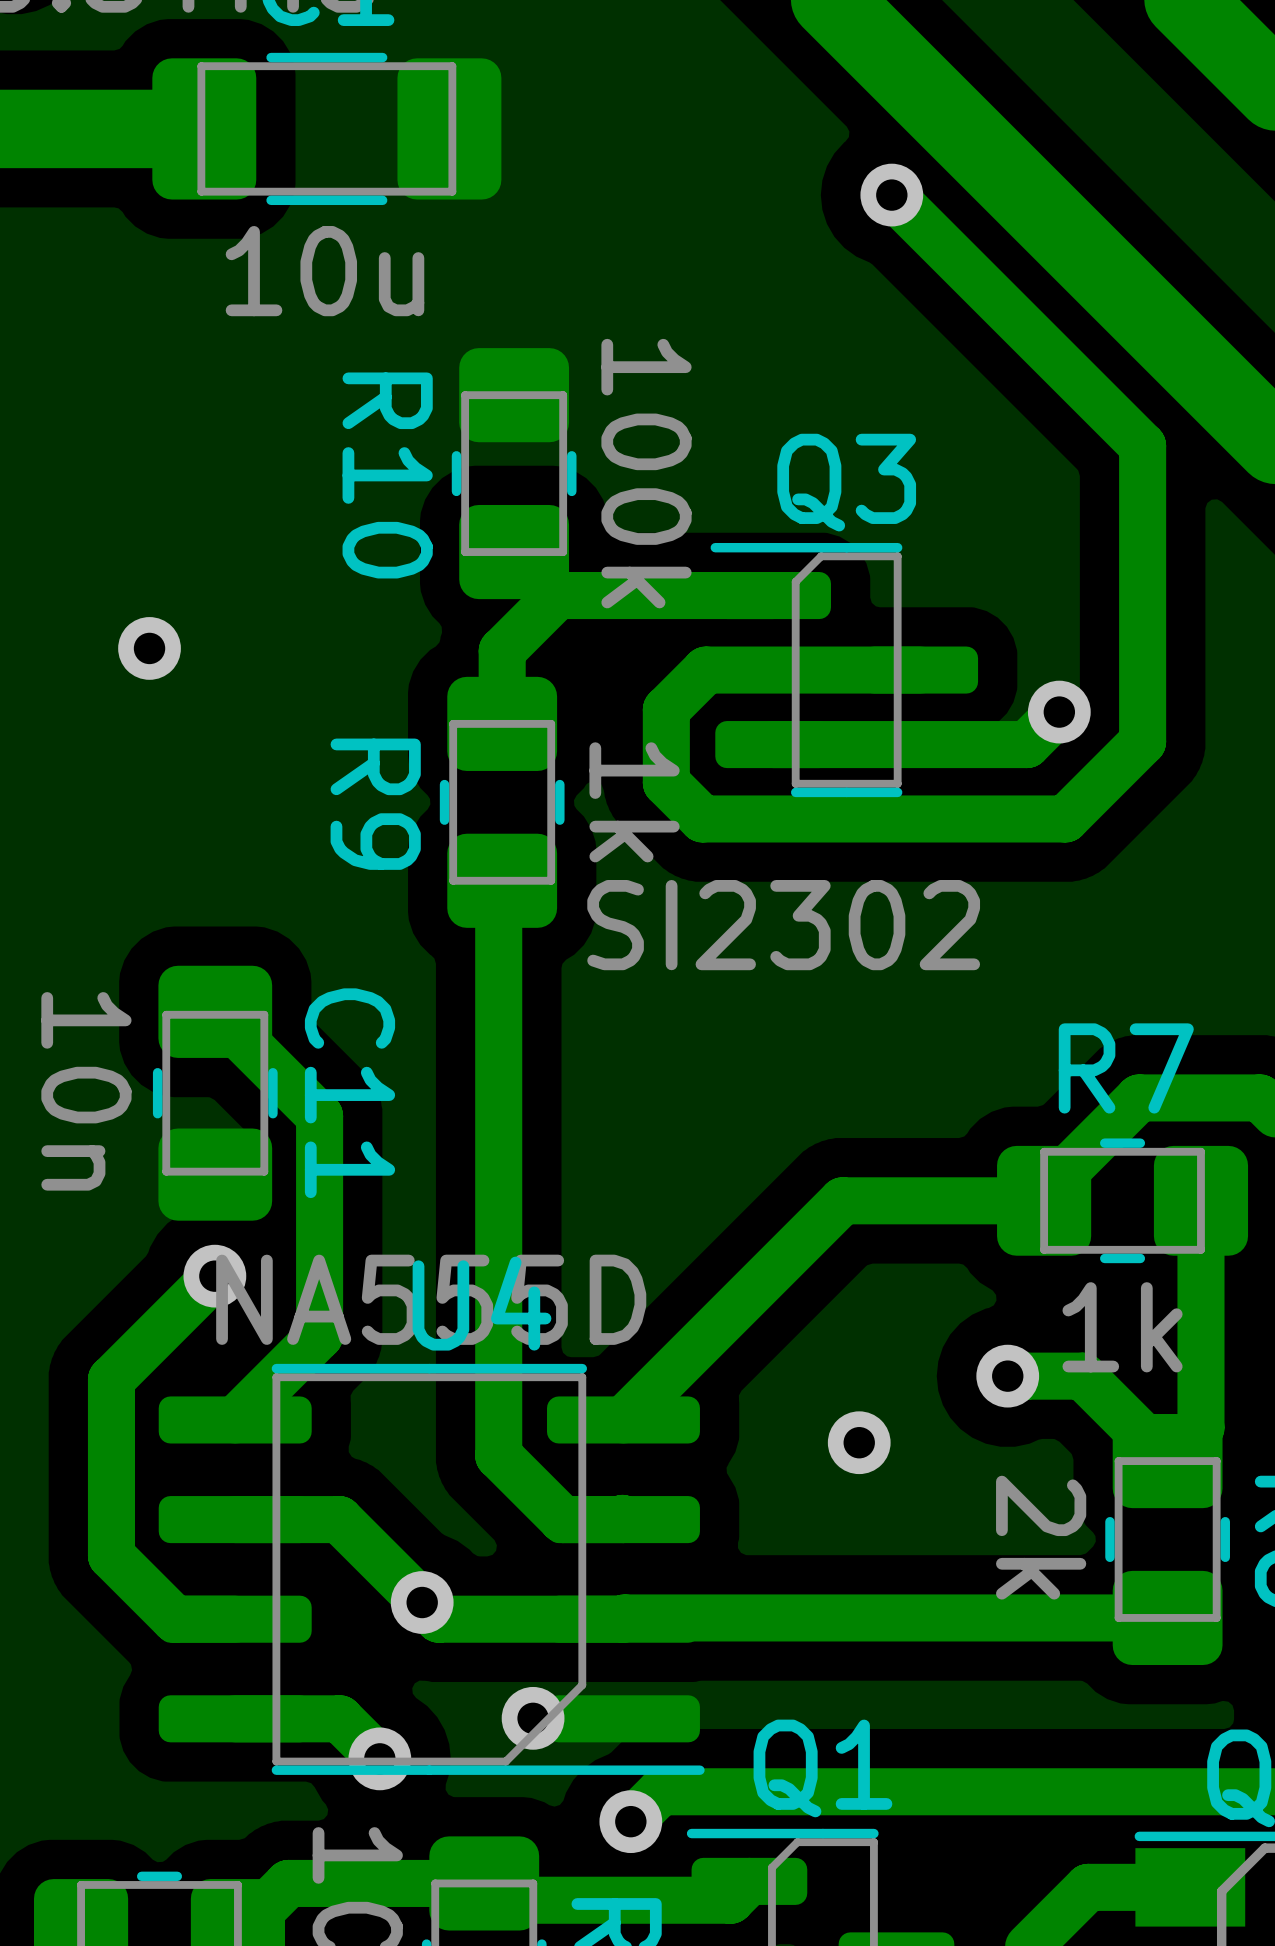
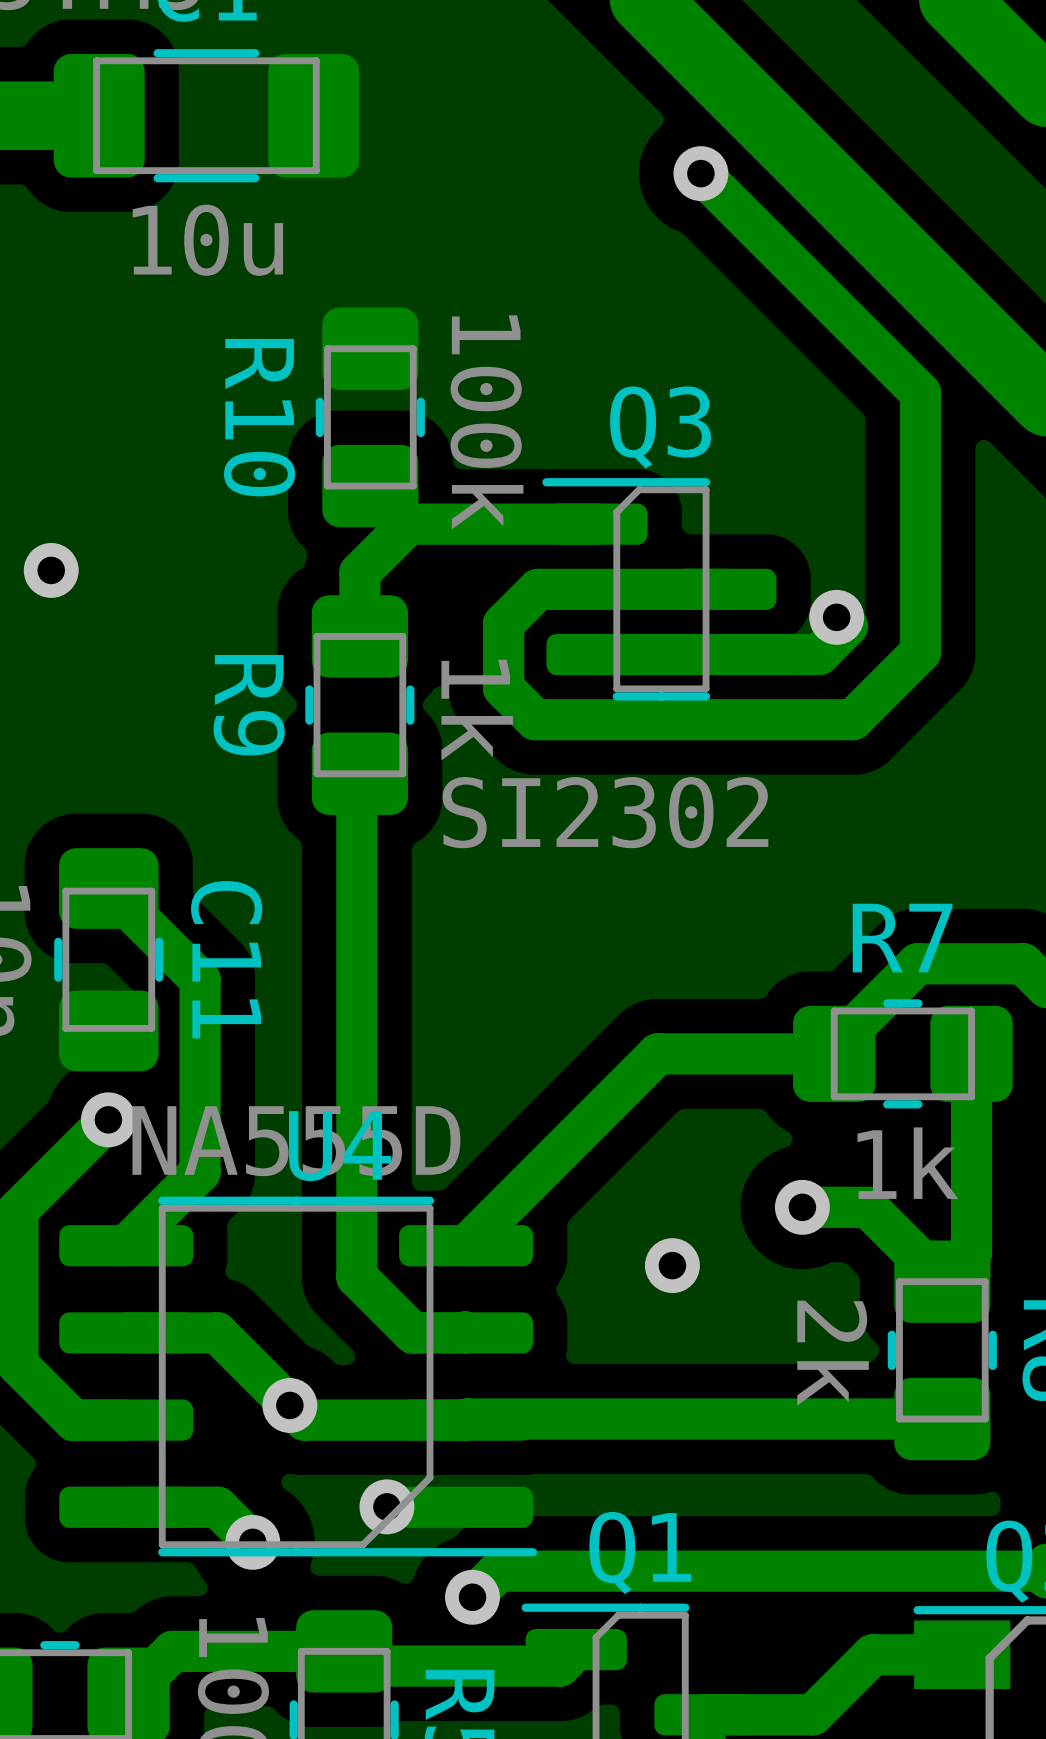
via position: (1059, 712) -> (836, 617)

